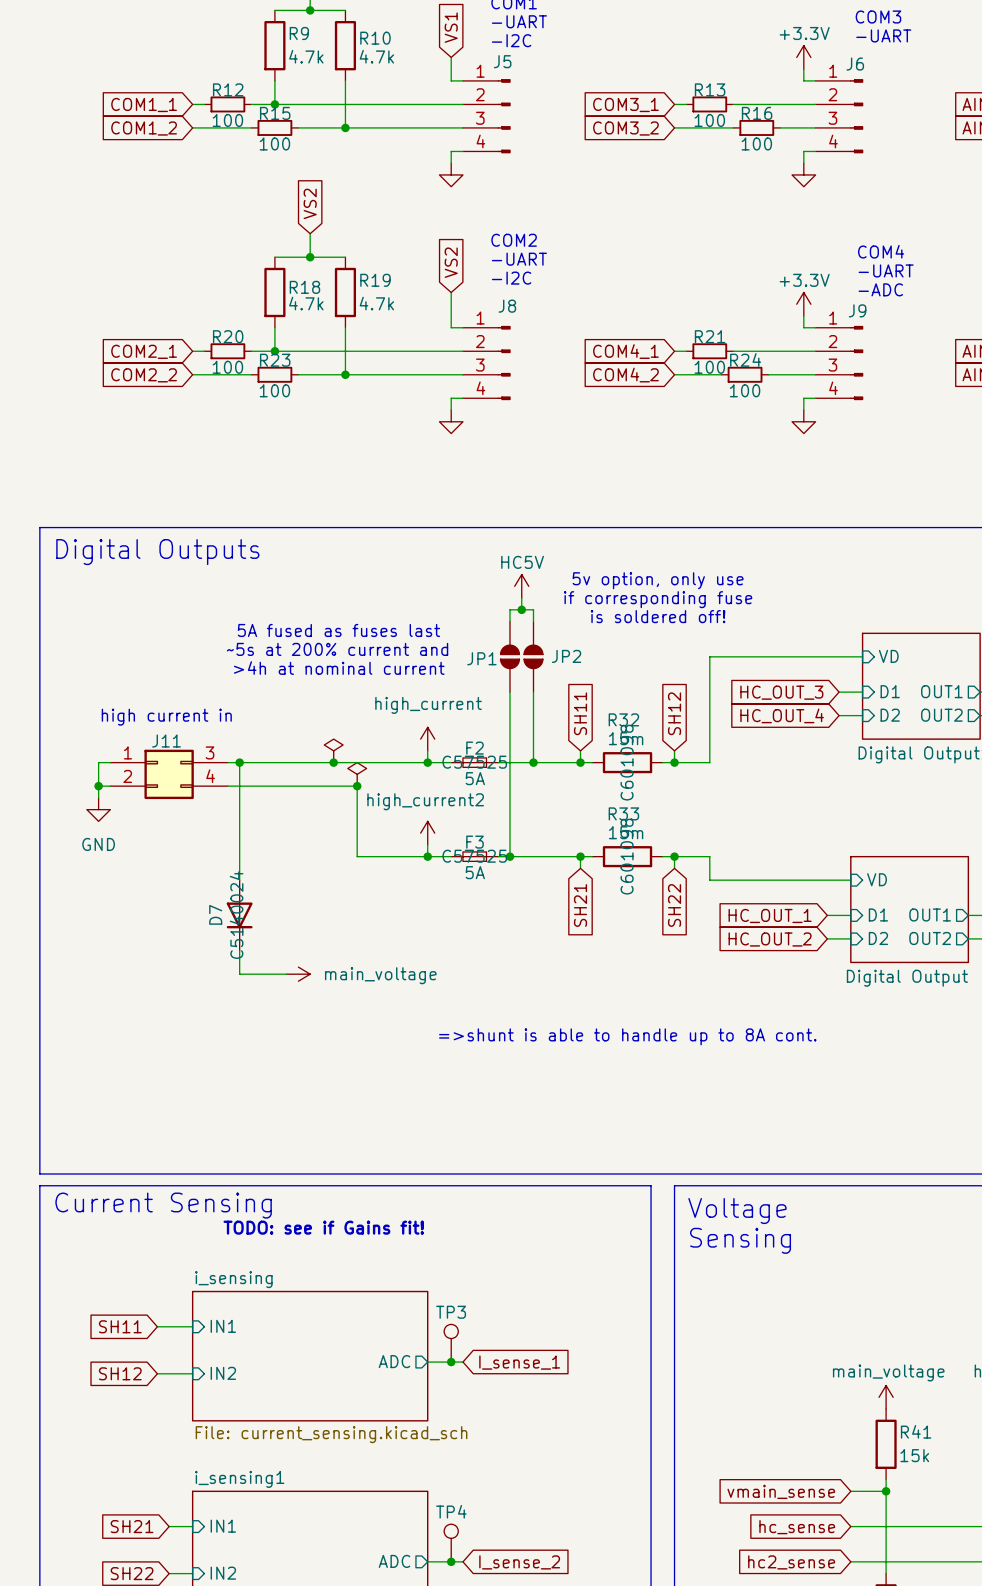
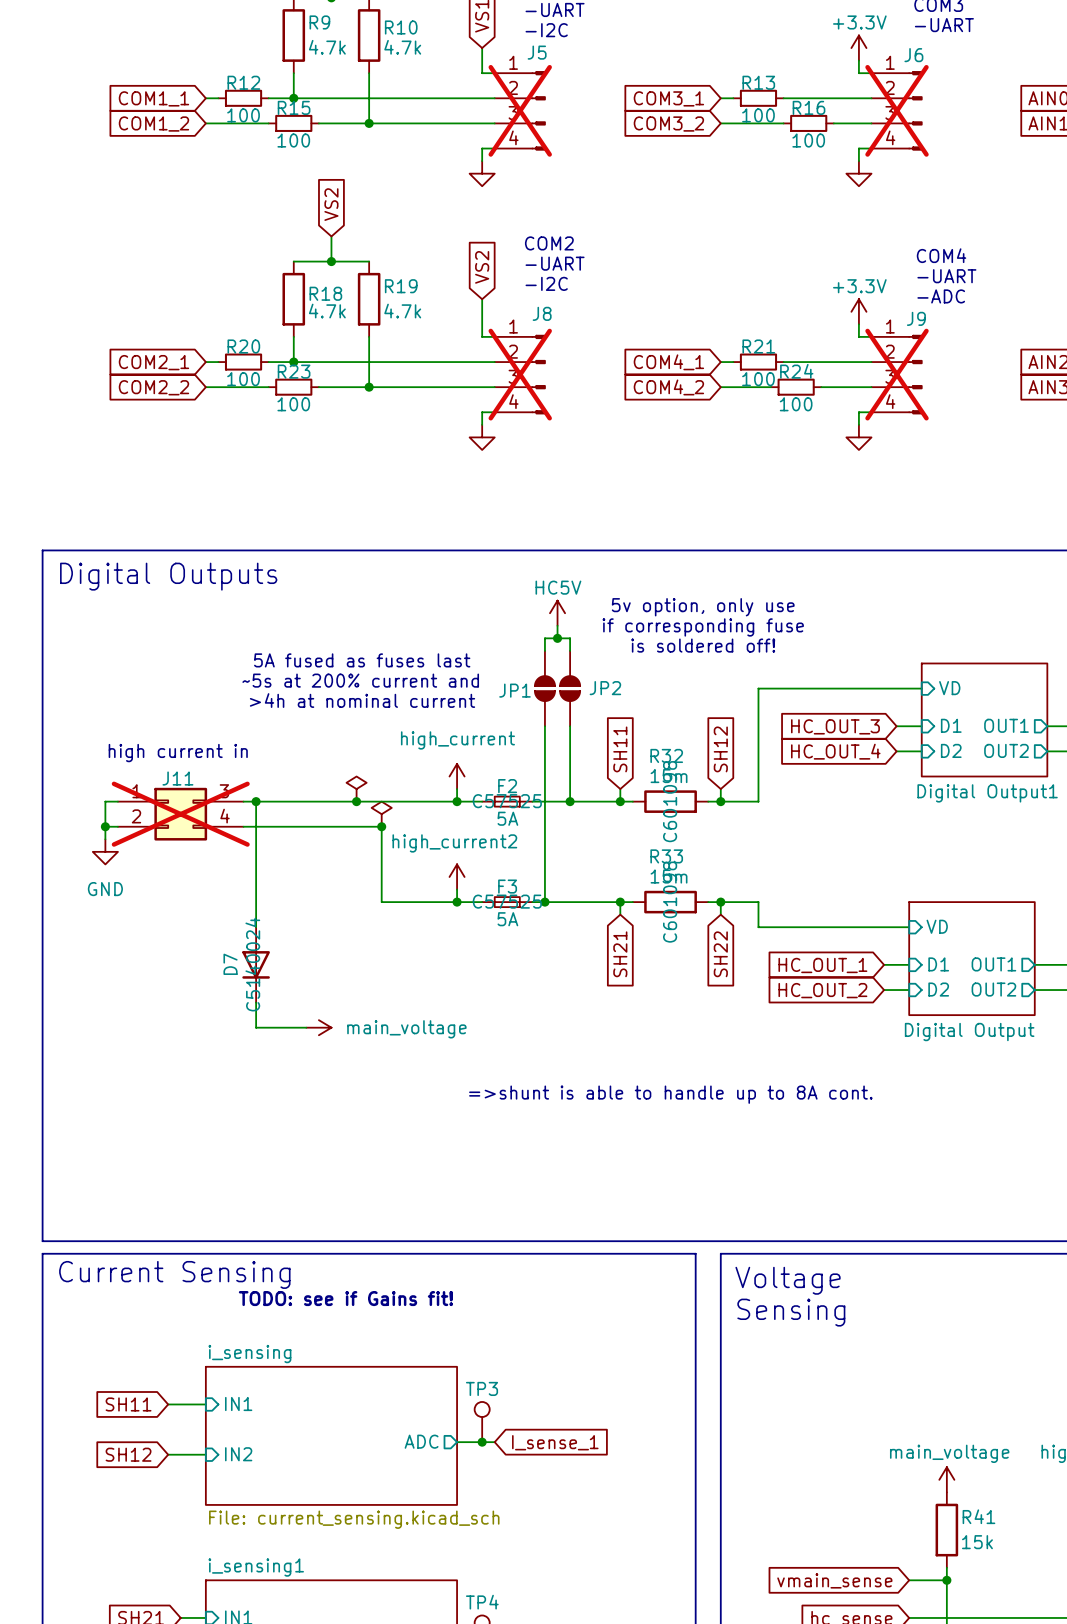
J5 do-not-place cross: none -> (520, 110)
J6 do-not-place cross: none -> (897, 110)
J8 do-not-place cross: none -> (520, 374)
J9 do-not-place cross: none -> (897, 374)
J11 do-not-place cross: none -> (180, 814)

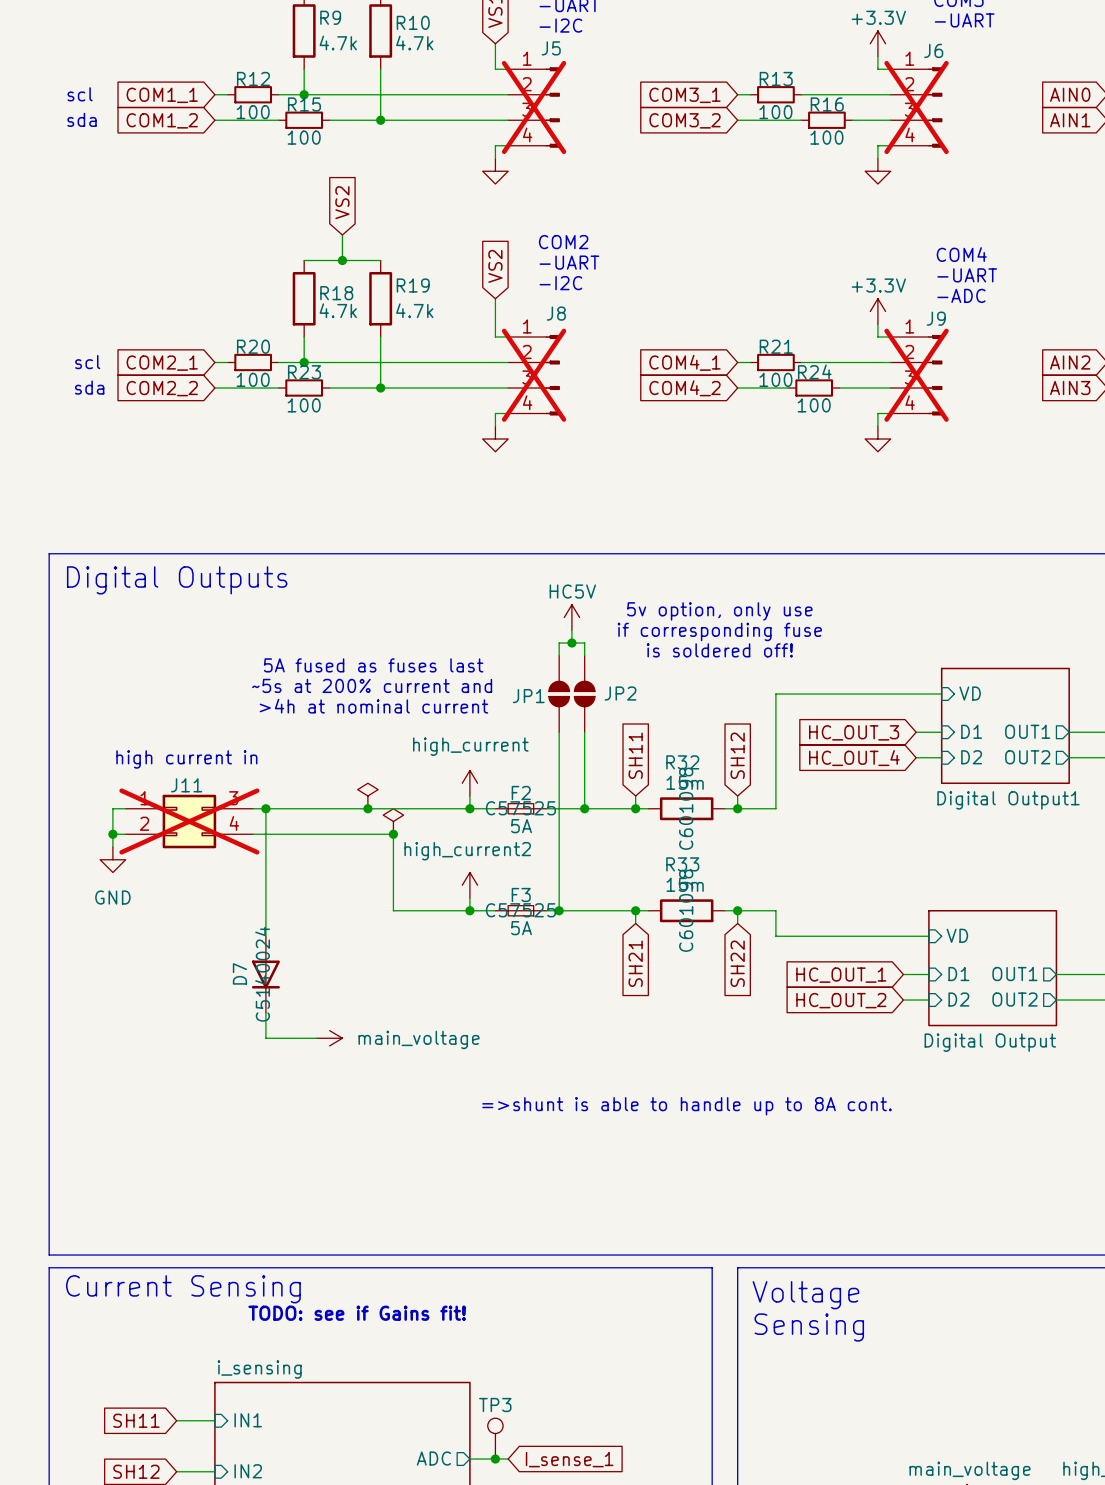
text: none -> scl (80, 94)
text: none -> sda (82, 119)
text: none -> scl (87, 362)
text: none -> sda (89, 387)

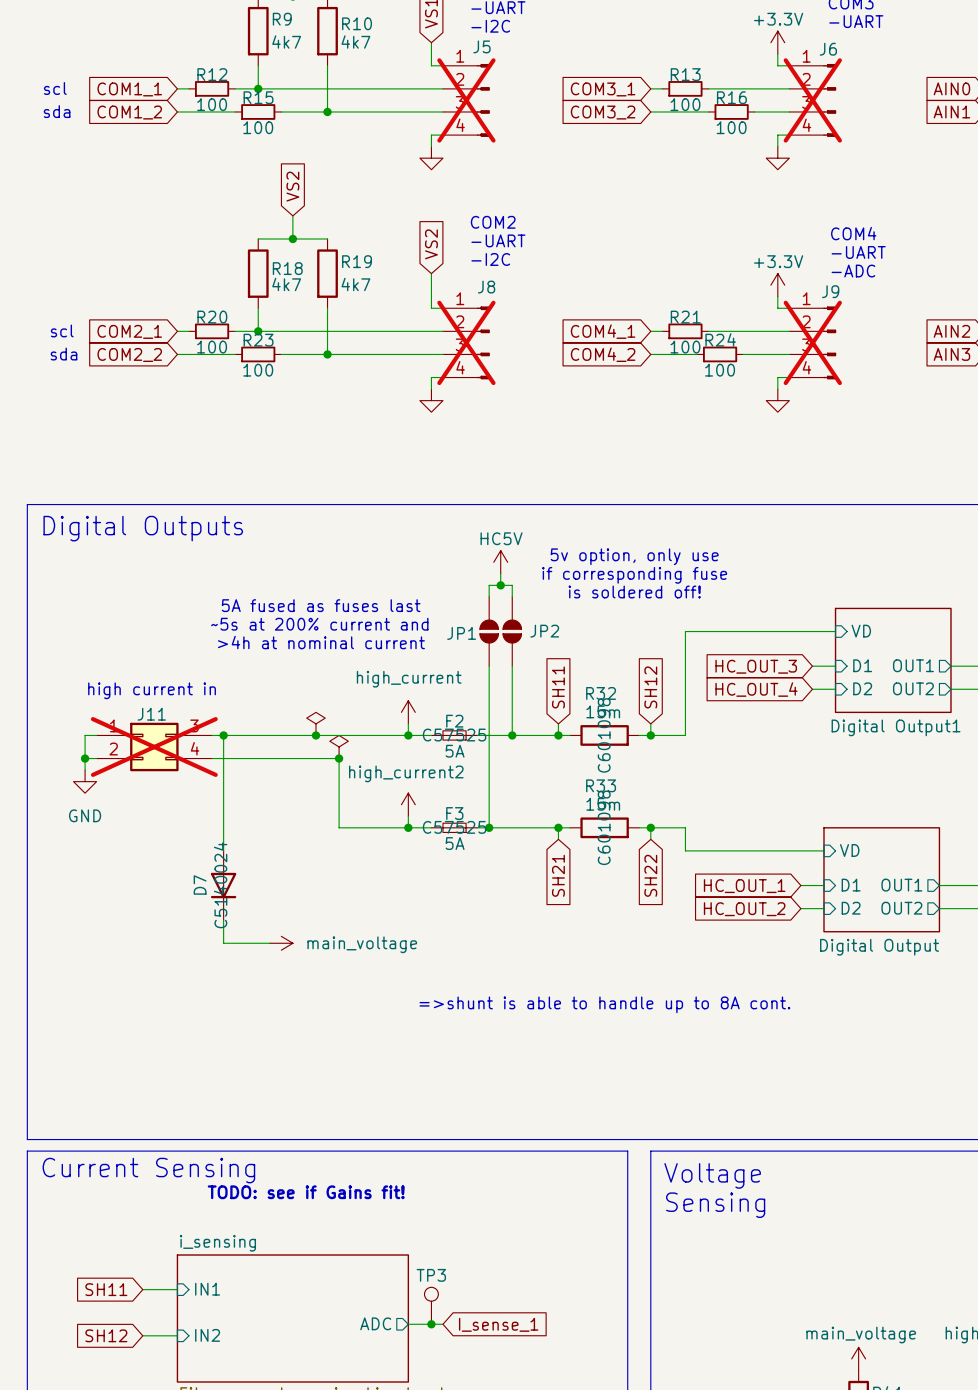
R9 value: 4.7k (338, 42) -> 4k7 (286, 42)
R10 value: 4.7k (414, 42) -> 4k7 (355, 42)
R18 value: 4.7k (338, 310) -> 4k7 (286, 284)
R19 value: 4.7k (414, 310) -> 4k7 (355, 284)

